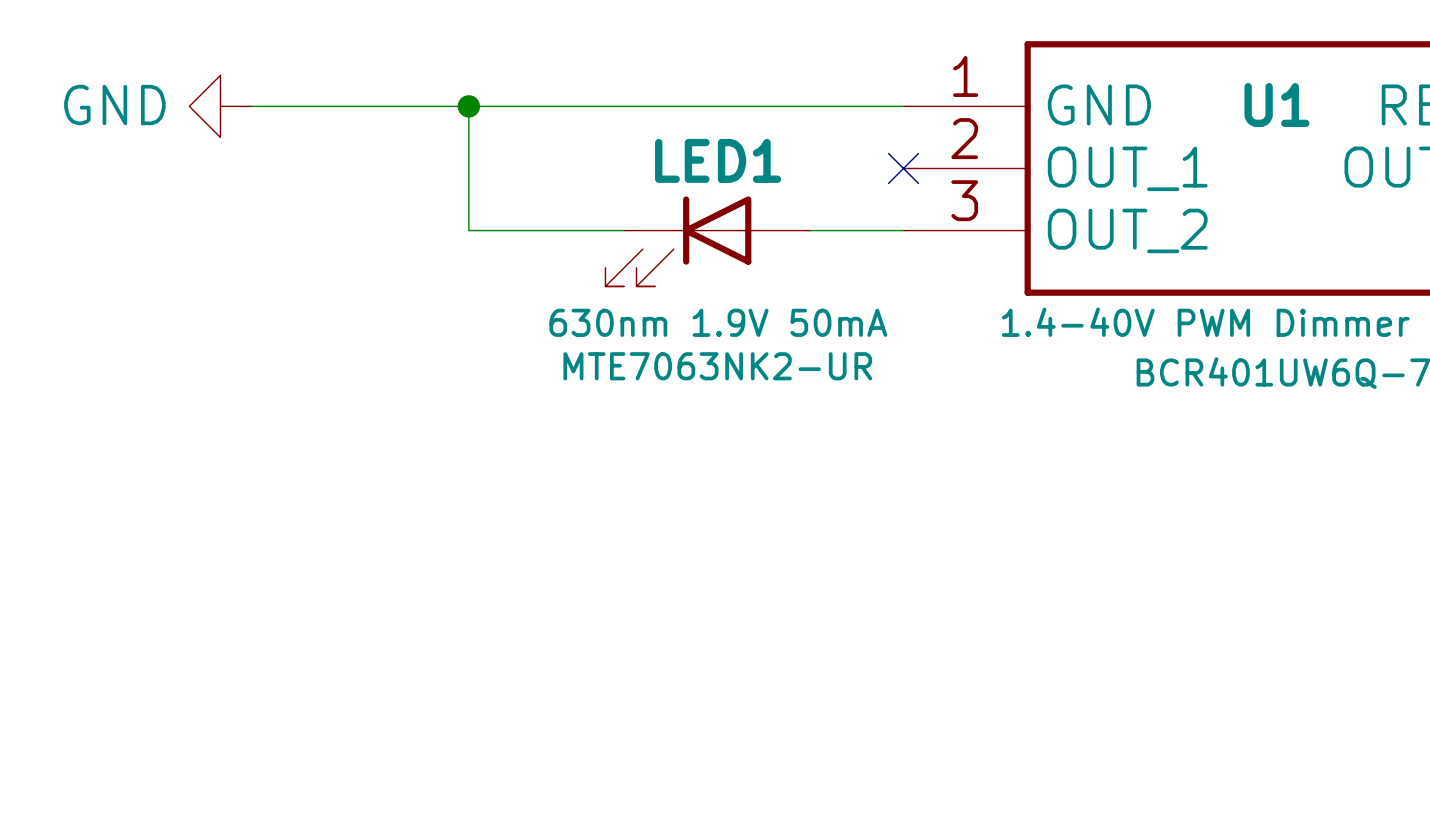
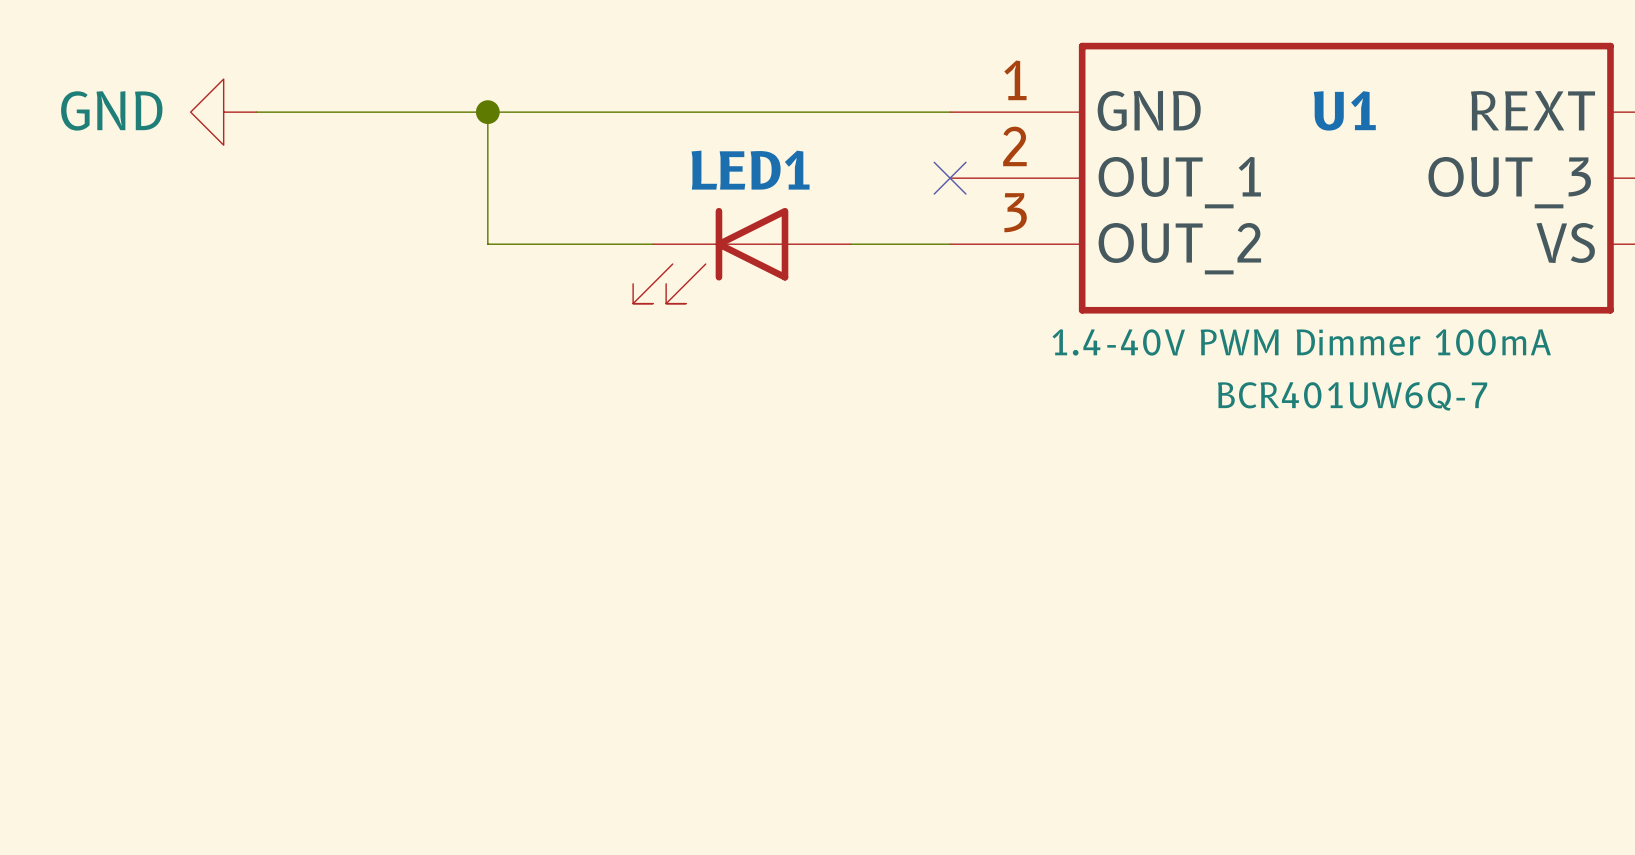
LED1 value: 630nm 1.9V 50mA (718, 322) -> none
LED1 text: MTE7063NK2-UR (717, 366) -> none

